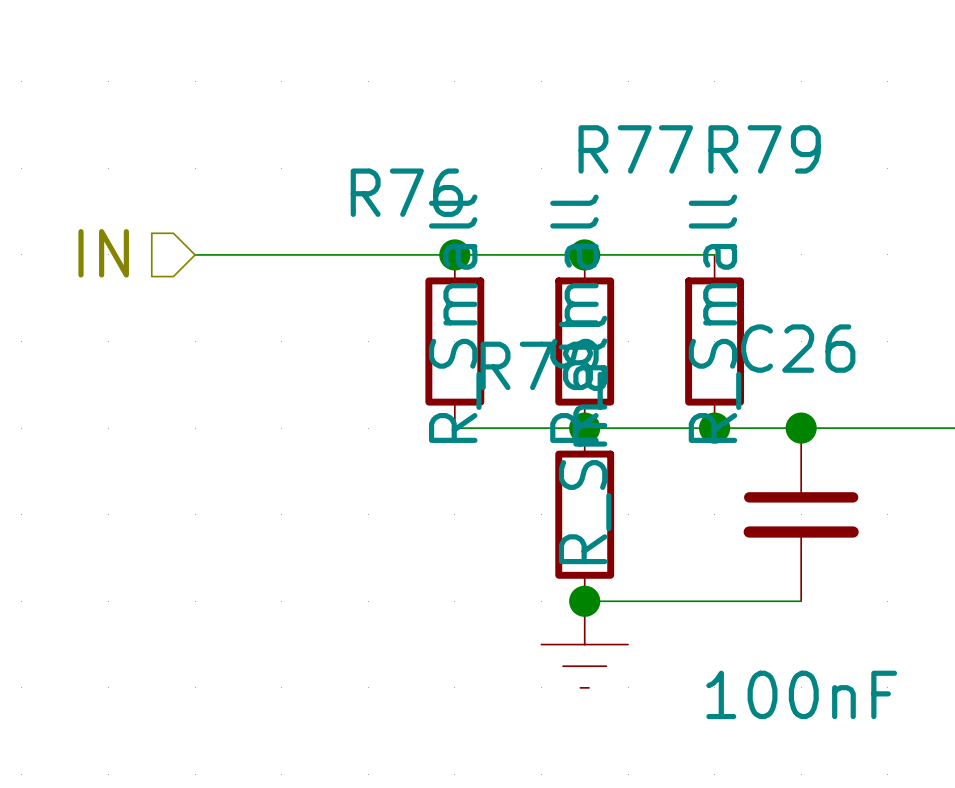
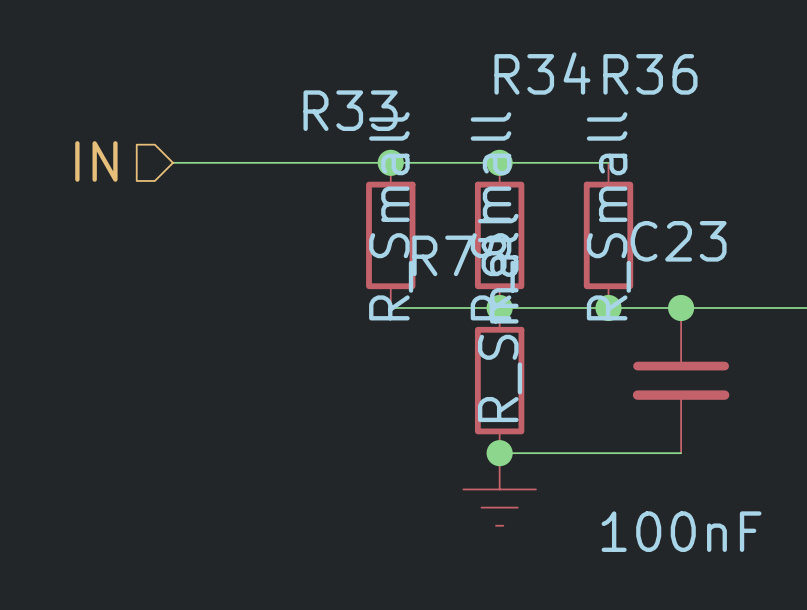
R77 name: R77 (635, 149) -> R34 (542, 73)
R79 name: R79 (764, 149) -> R36 (650, 74)
R76 name: R76 (406, 192) -> R33 (350, 110)
C26 name: C26 (798, 348) -> C23 (678, 241)

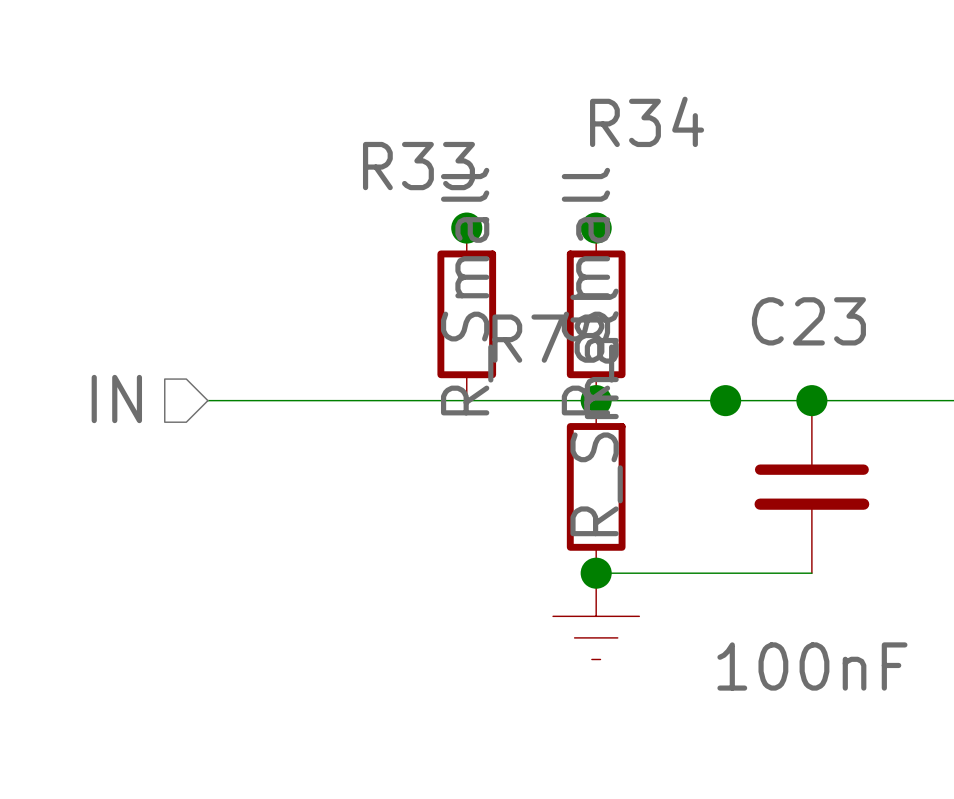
hierarchical label position: IN (96, 161) -> IN (116, 399)
wire: (173, 162) (608, 162) -> none
R36: R_Small (608, 235) -> none
wire: none -> (207, 400) (466, 400)

